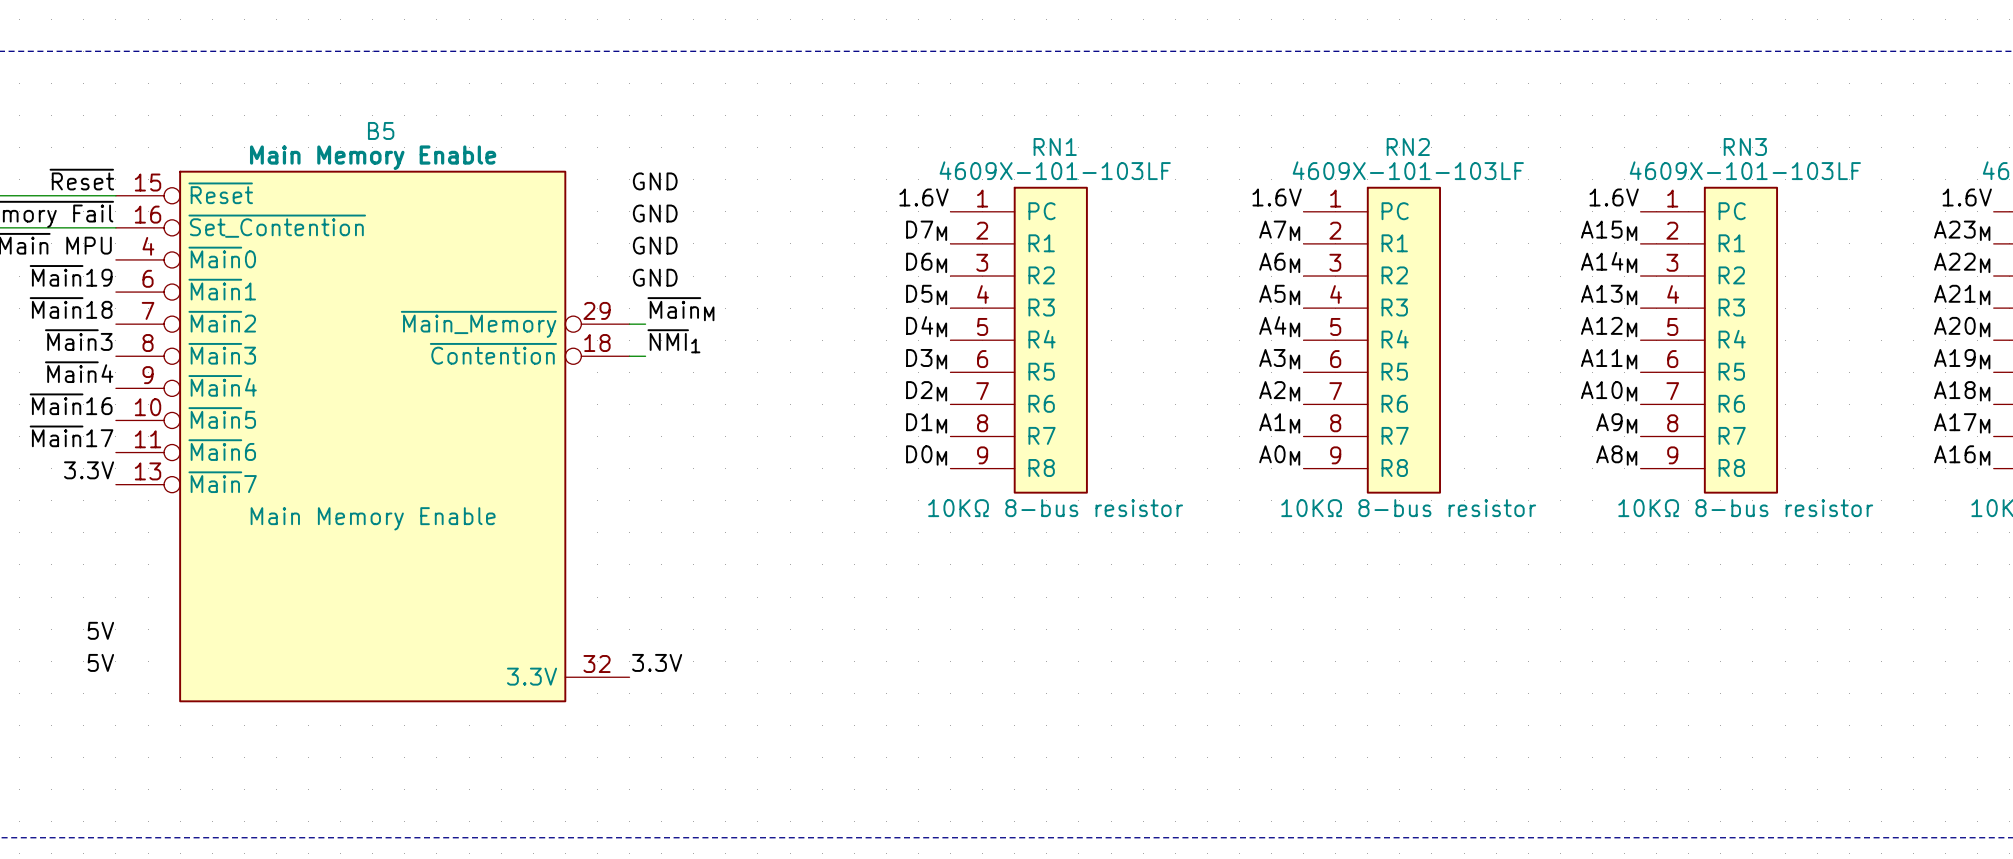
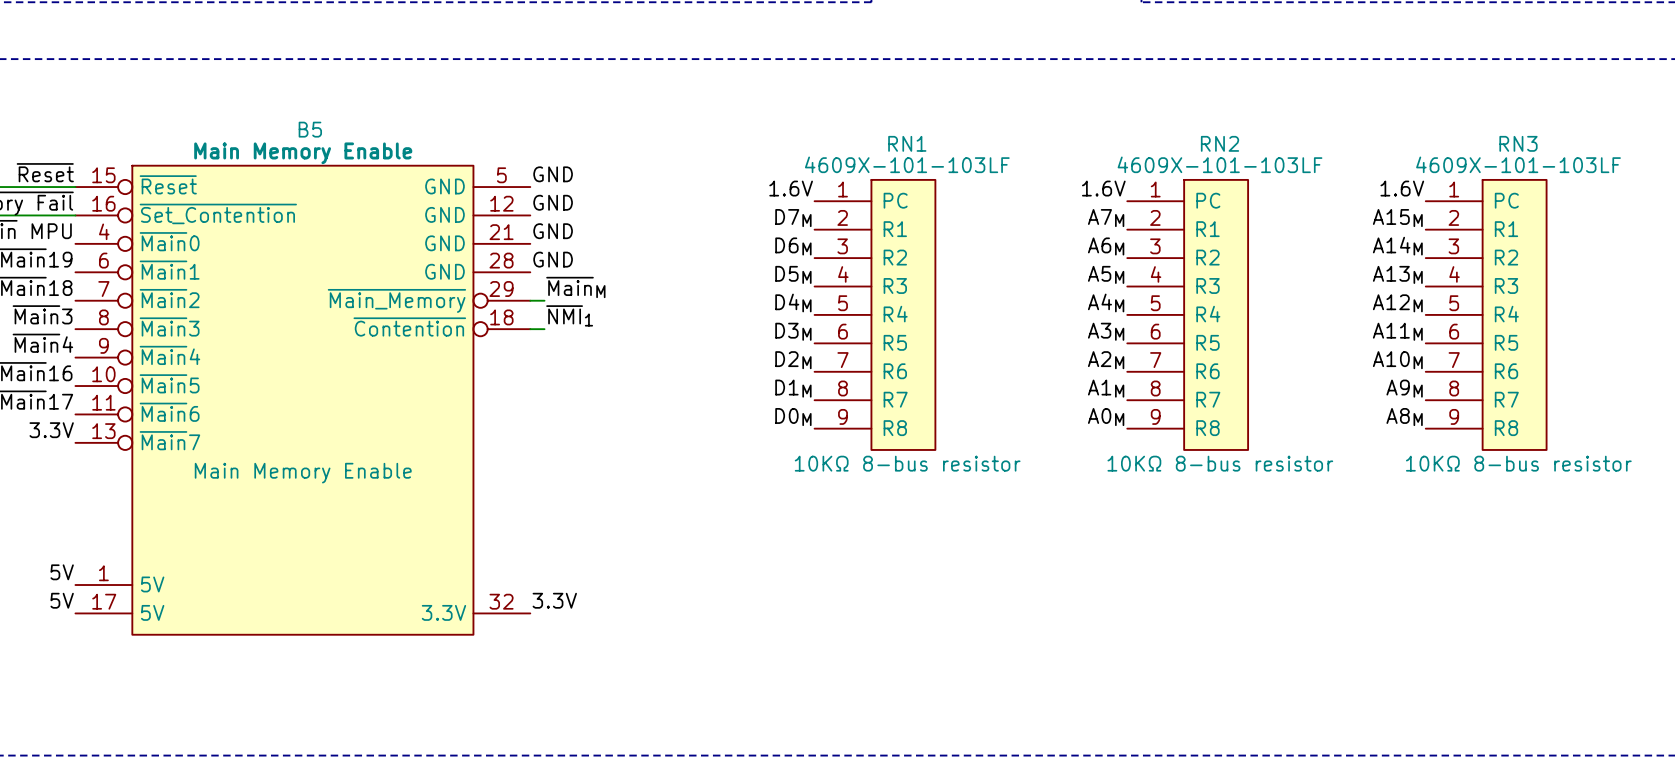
B5 symbol: [115, 170, 630, 703] -> [75, 164, 531, 636]

